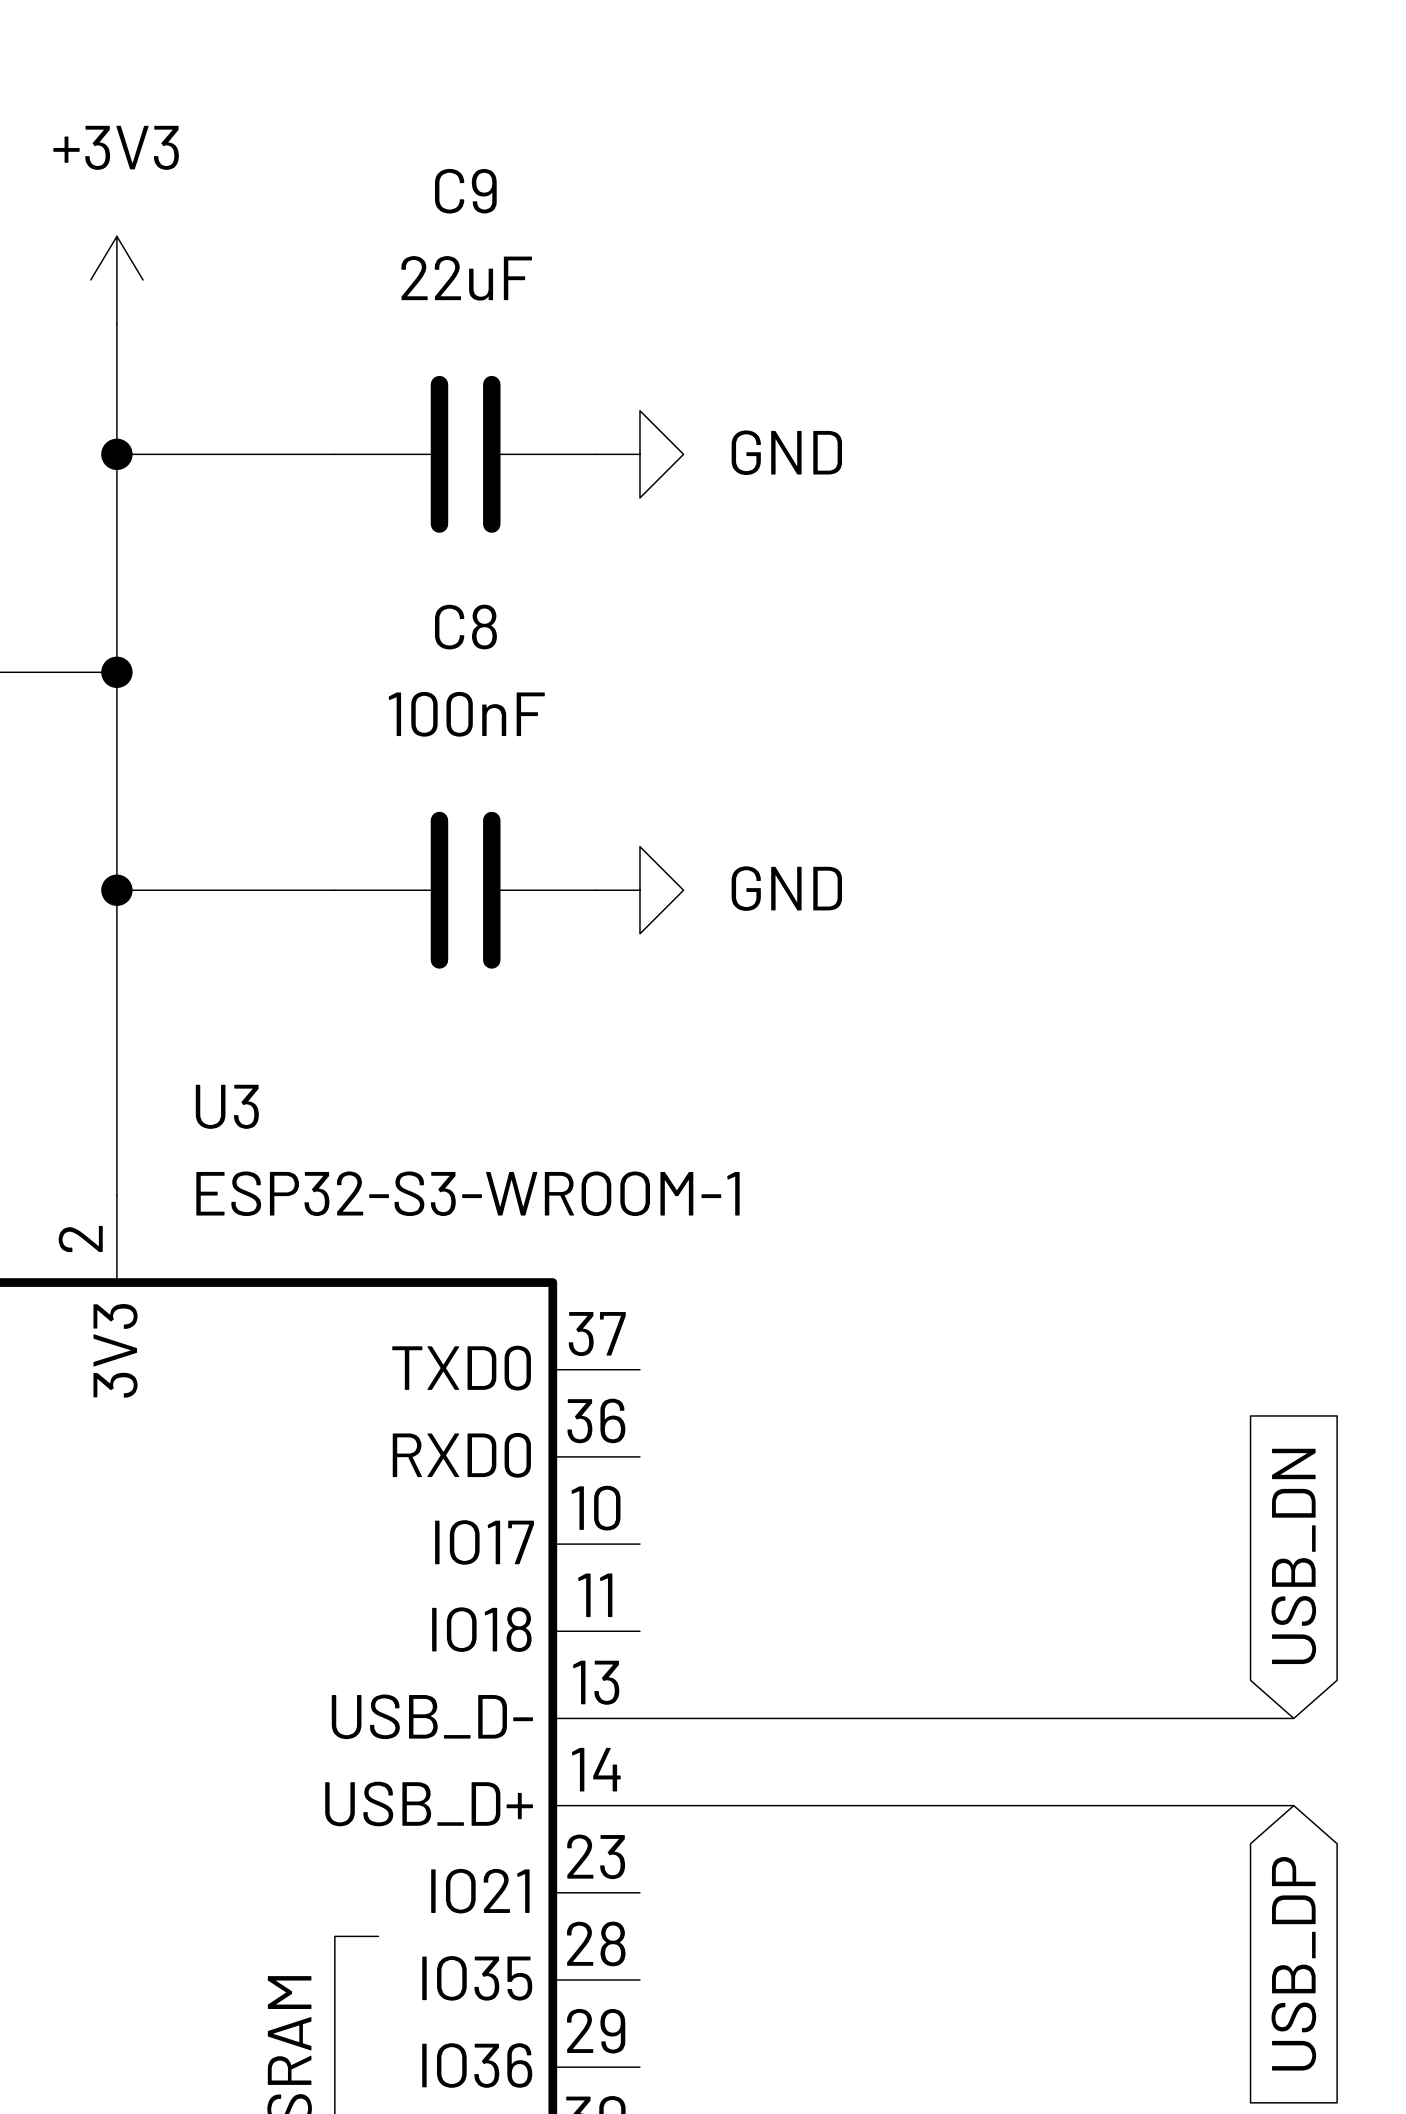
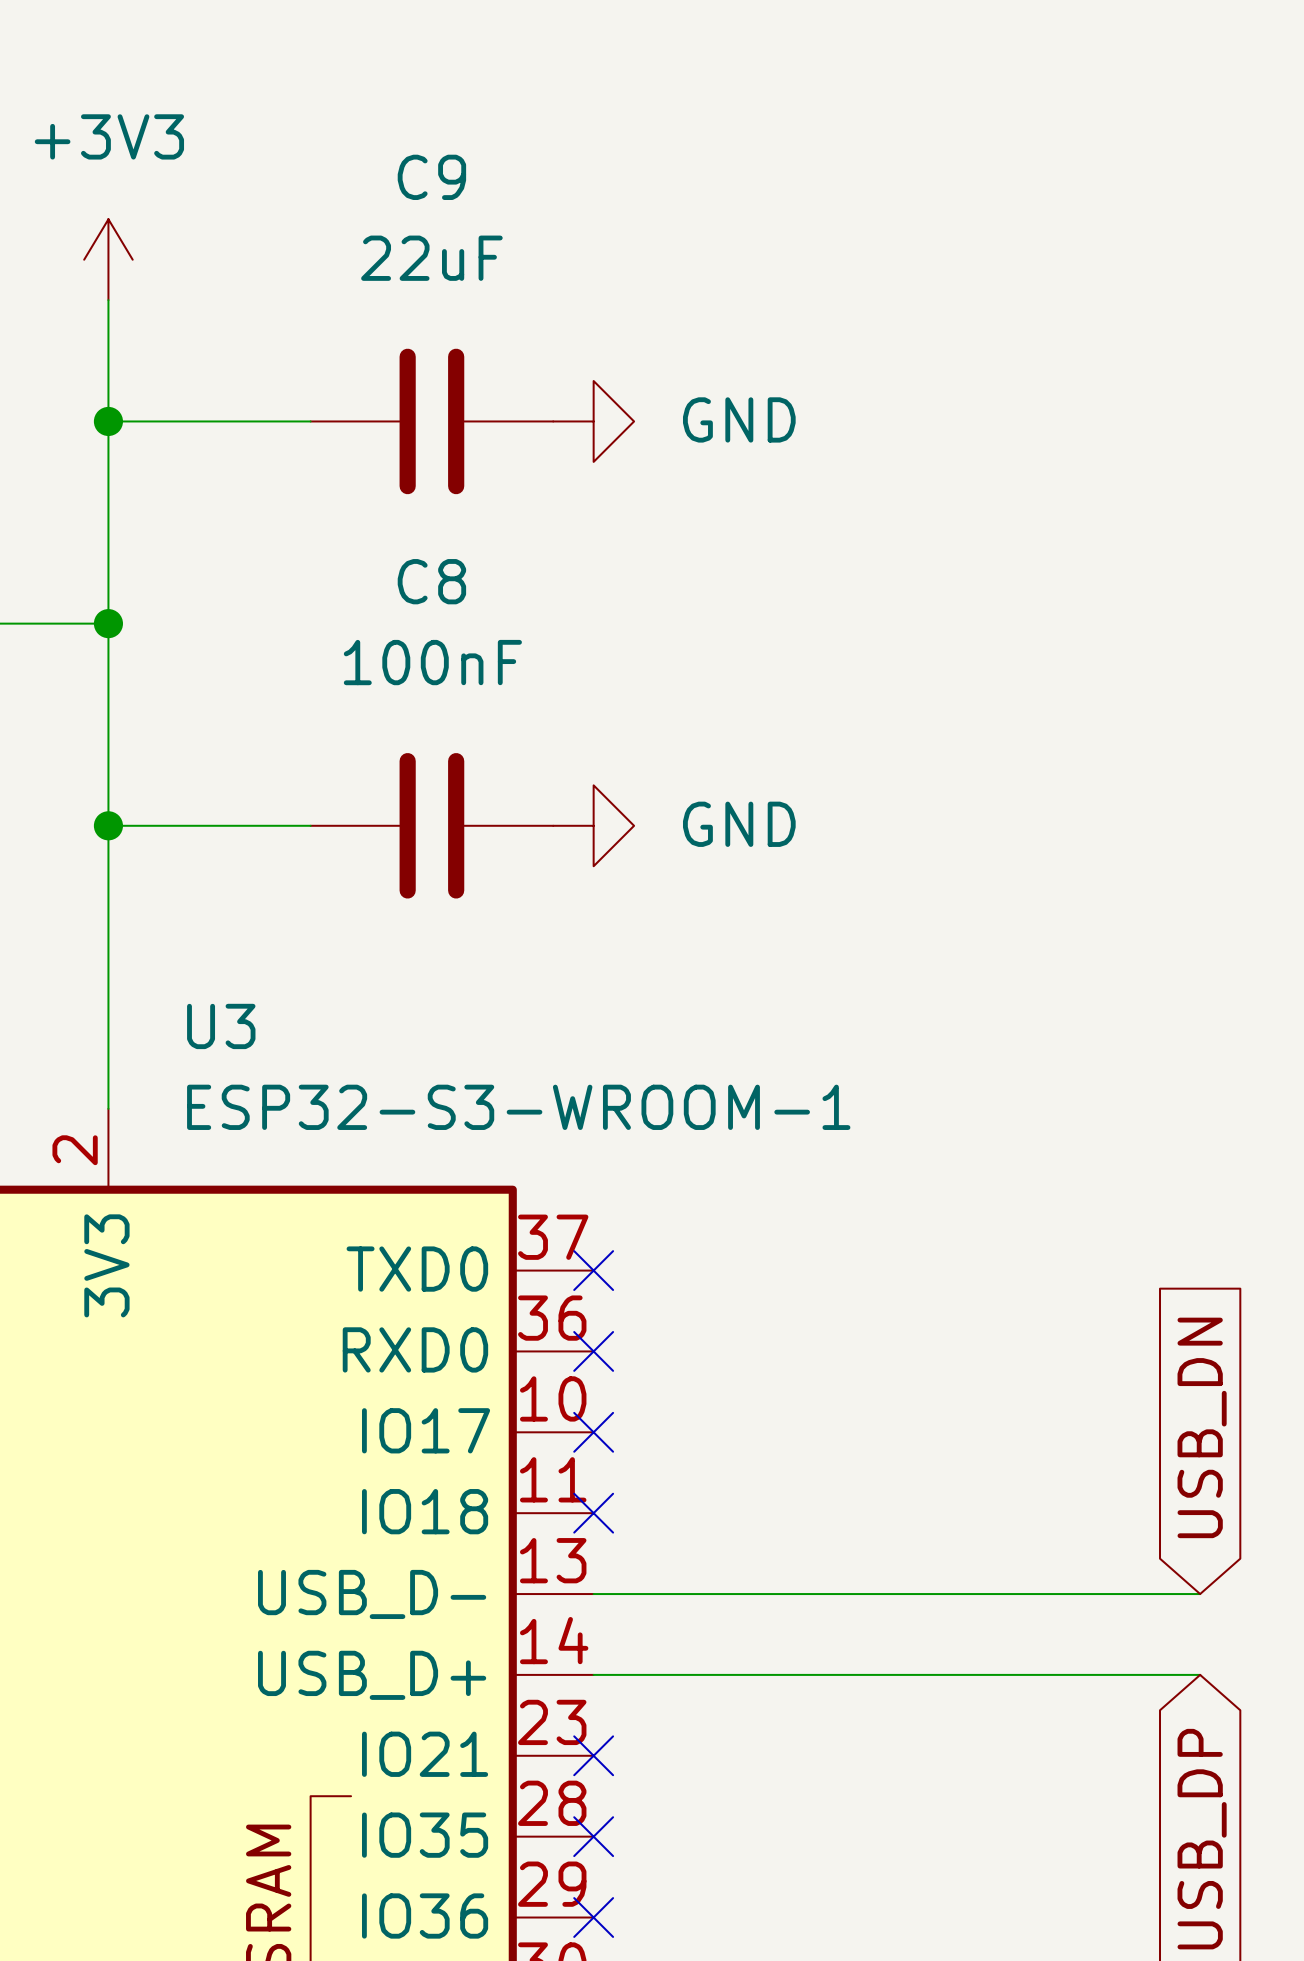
no-connect mark: none -> (593, 1270)
no-connect mark: none -> (593, 1351)
no-connect mark: none -> (593, 1432)
no-connect mark: none -> (593, 1513)
no-connect mark: none -> (593, 1755)
no-connect mark: none -> (593, 1836)
no-connect mark: none -> (593, 1917)

